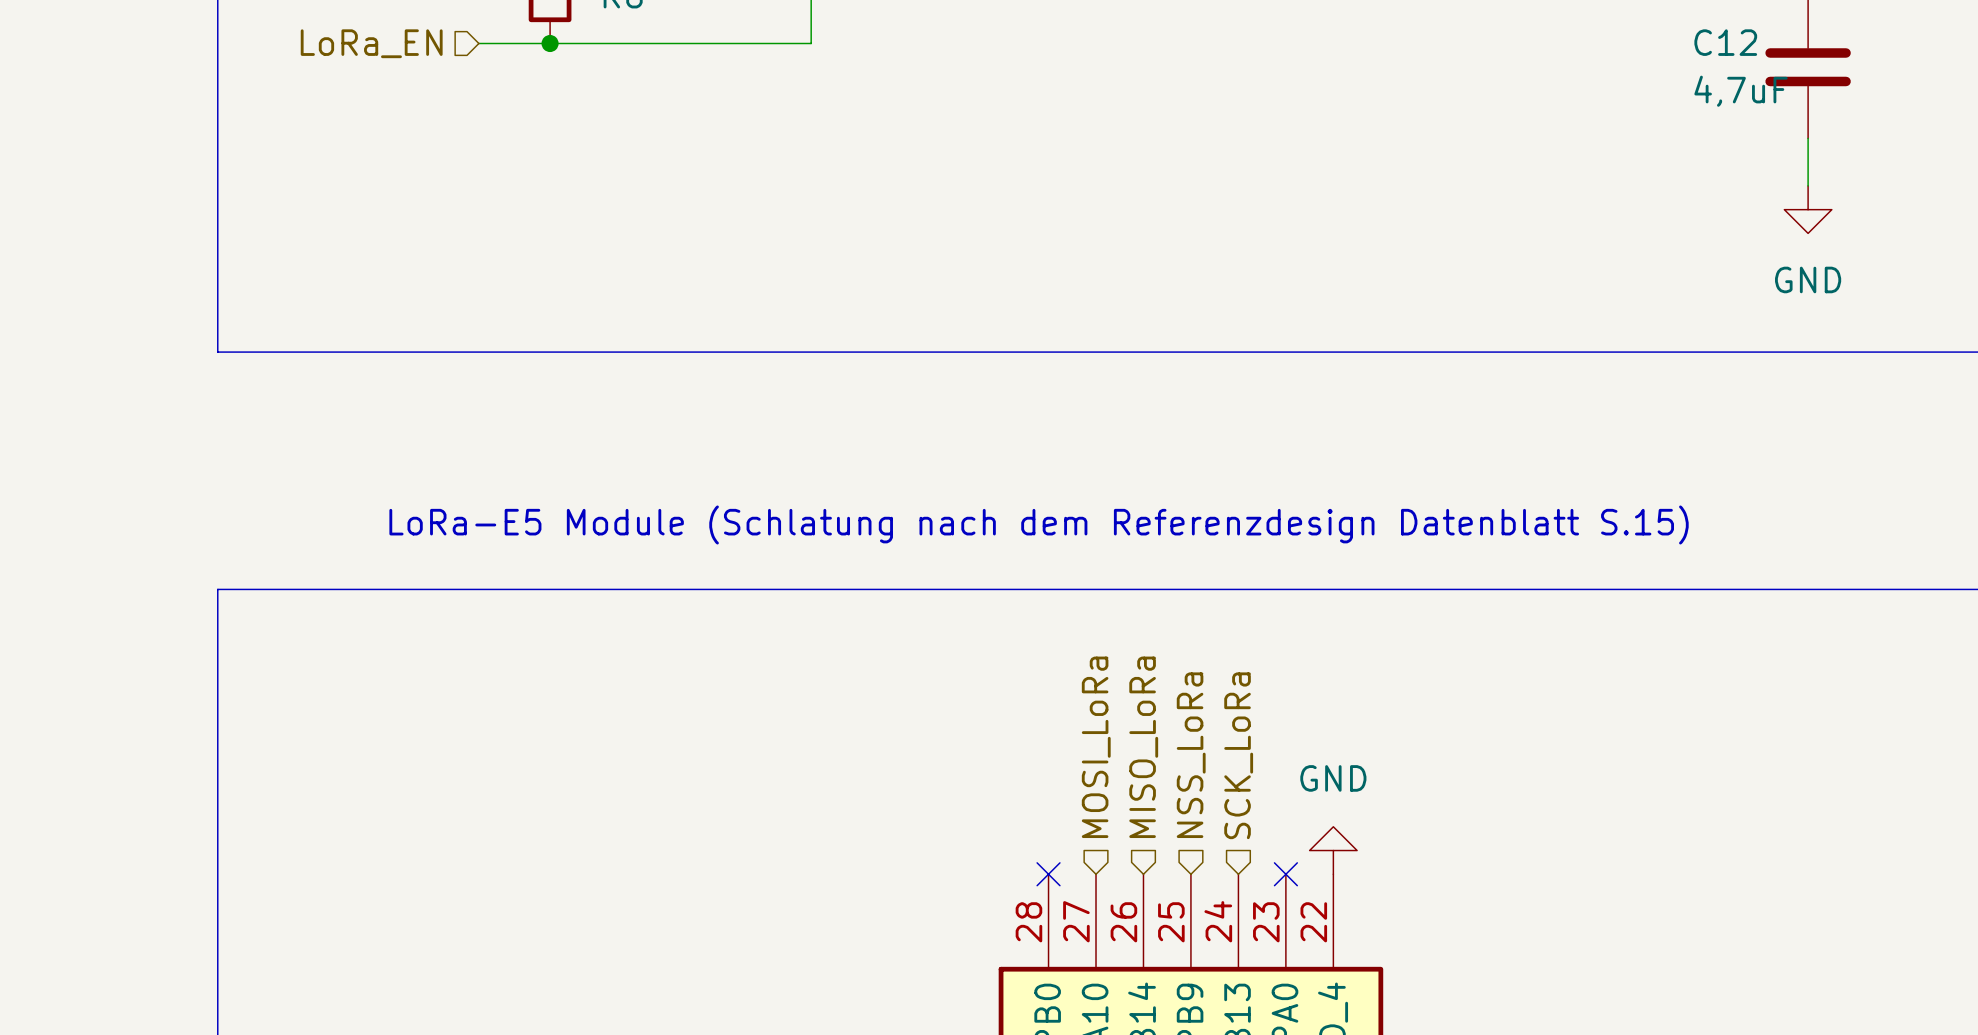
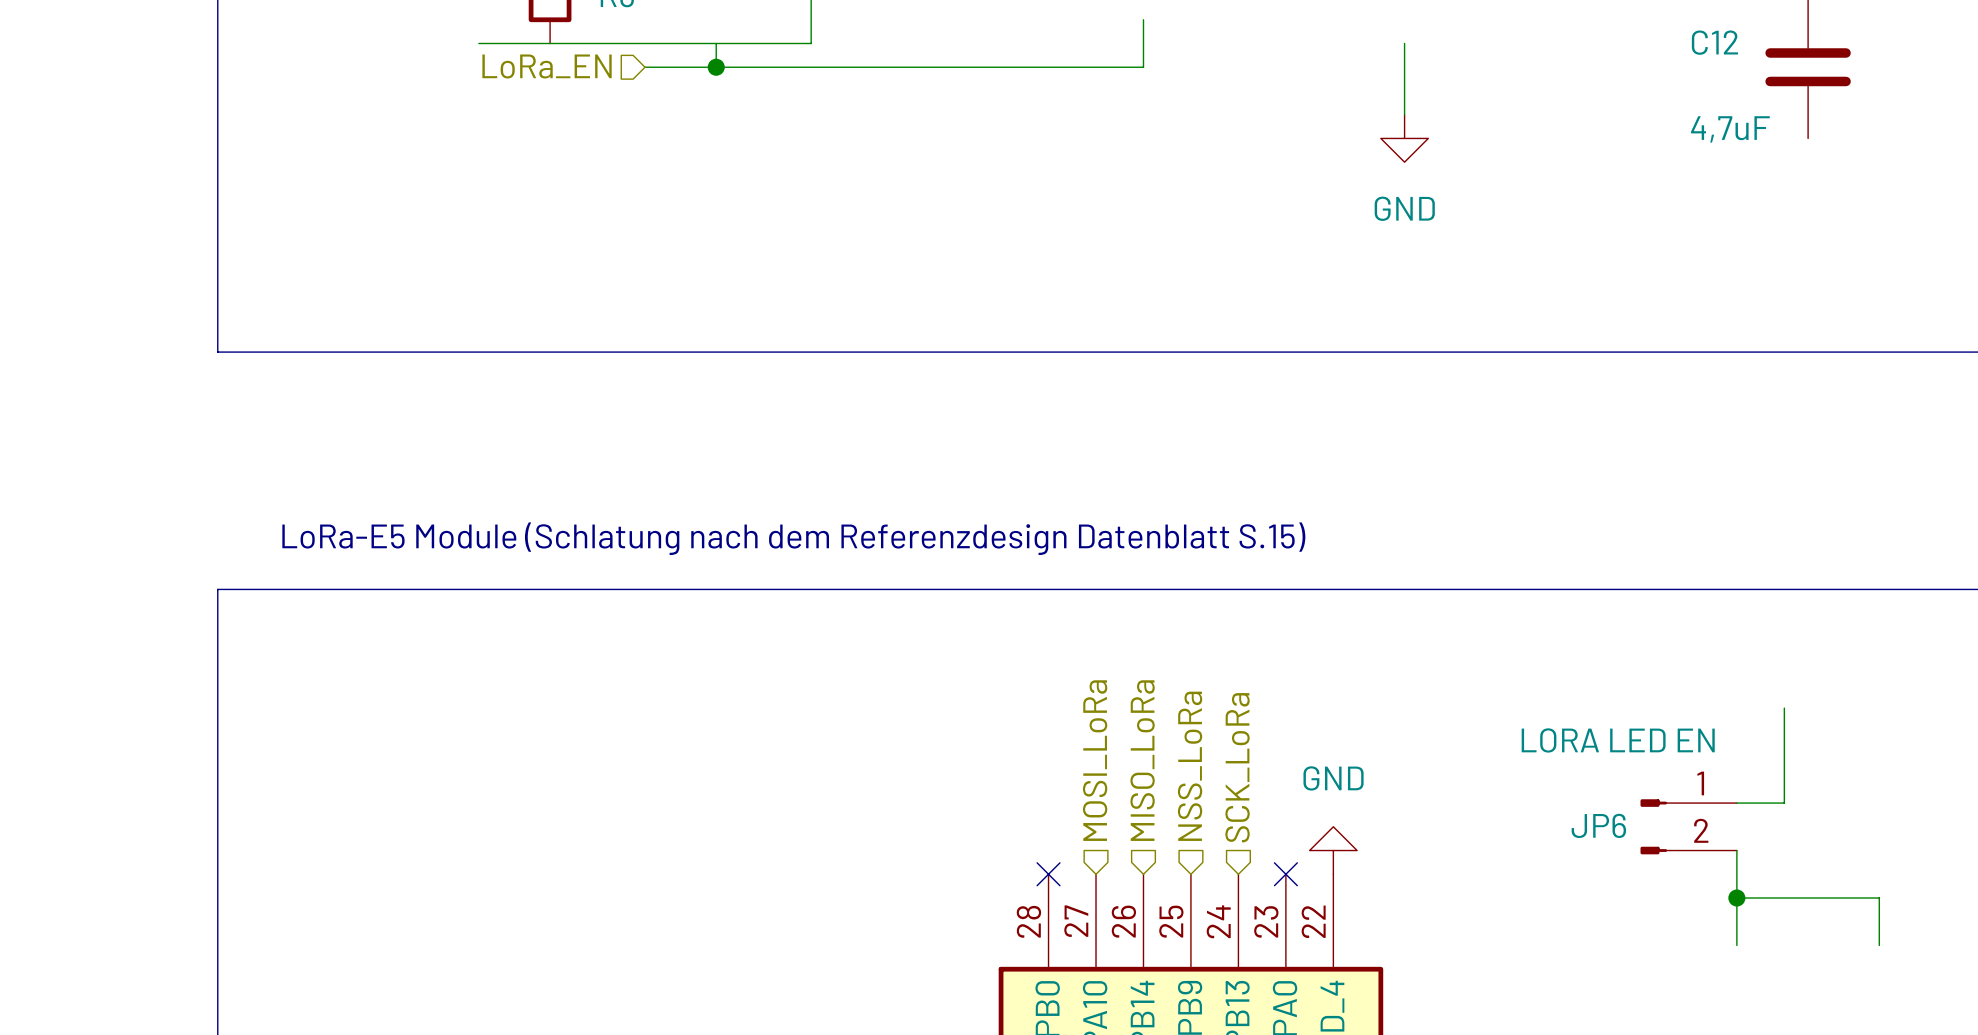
wire: none -> (1143, 19) (1143, 67) (645, 67)
hierarchical label position: LoRa_EN (371, 43) -> LoRa_EN (547, 66)
junction: (550, 43) -> none
wire: none -> (716, 43) (716, 67)
wire: none -> (1404, 43) (1404, 114)
junction: none -> (716, 67)
C12 value position: 4,7uF (1741, 91) -> 4,7uF (1730, 129)
wire: (1808, 138) (1808, 185) -> none
power symbol position: GND (1808, 209) -> GND (1404, 138)
text position: LoRa-E5 Module (Schlatung nach dem Referenzdesign Datenblatt S.15) (1039, 524) -> LoRa-E5 Module (Schlatung nach dem Referenzdesign Datenblatt S.15) (793, 538)
wire: none -> (1784, 708) (1784, 803) (1736, 803)
JP6: none -> (1688, 826)
wire: none -> (1736, 850) (1736, 945)
wire: none -> (1736, 898) (1879, 898) (1879, 945)
junction: none -> (1736, 898)

